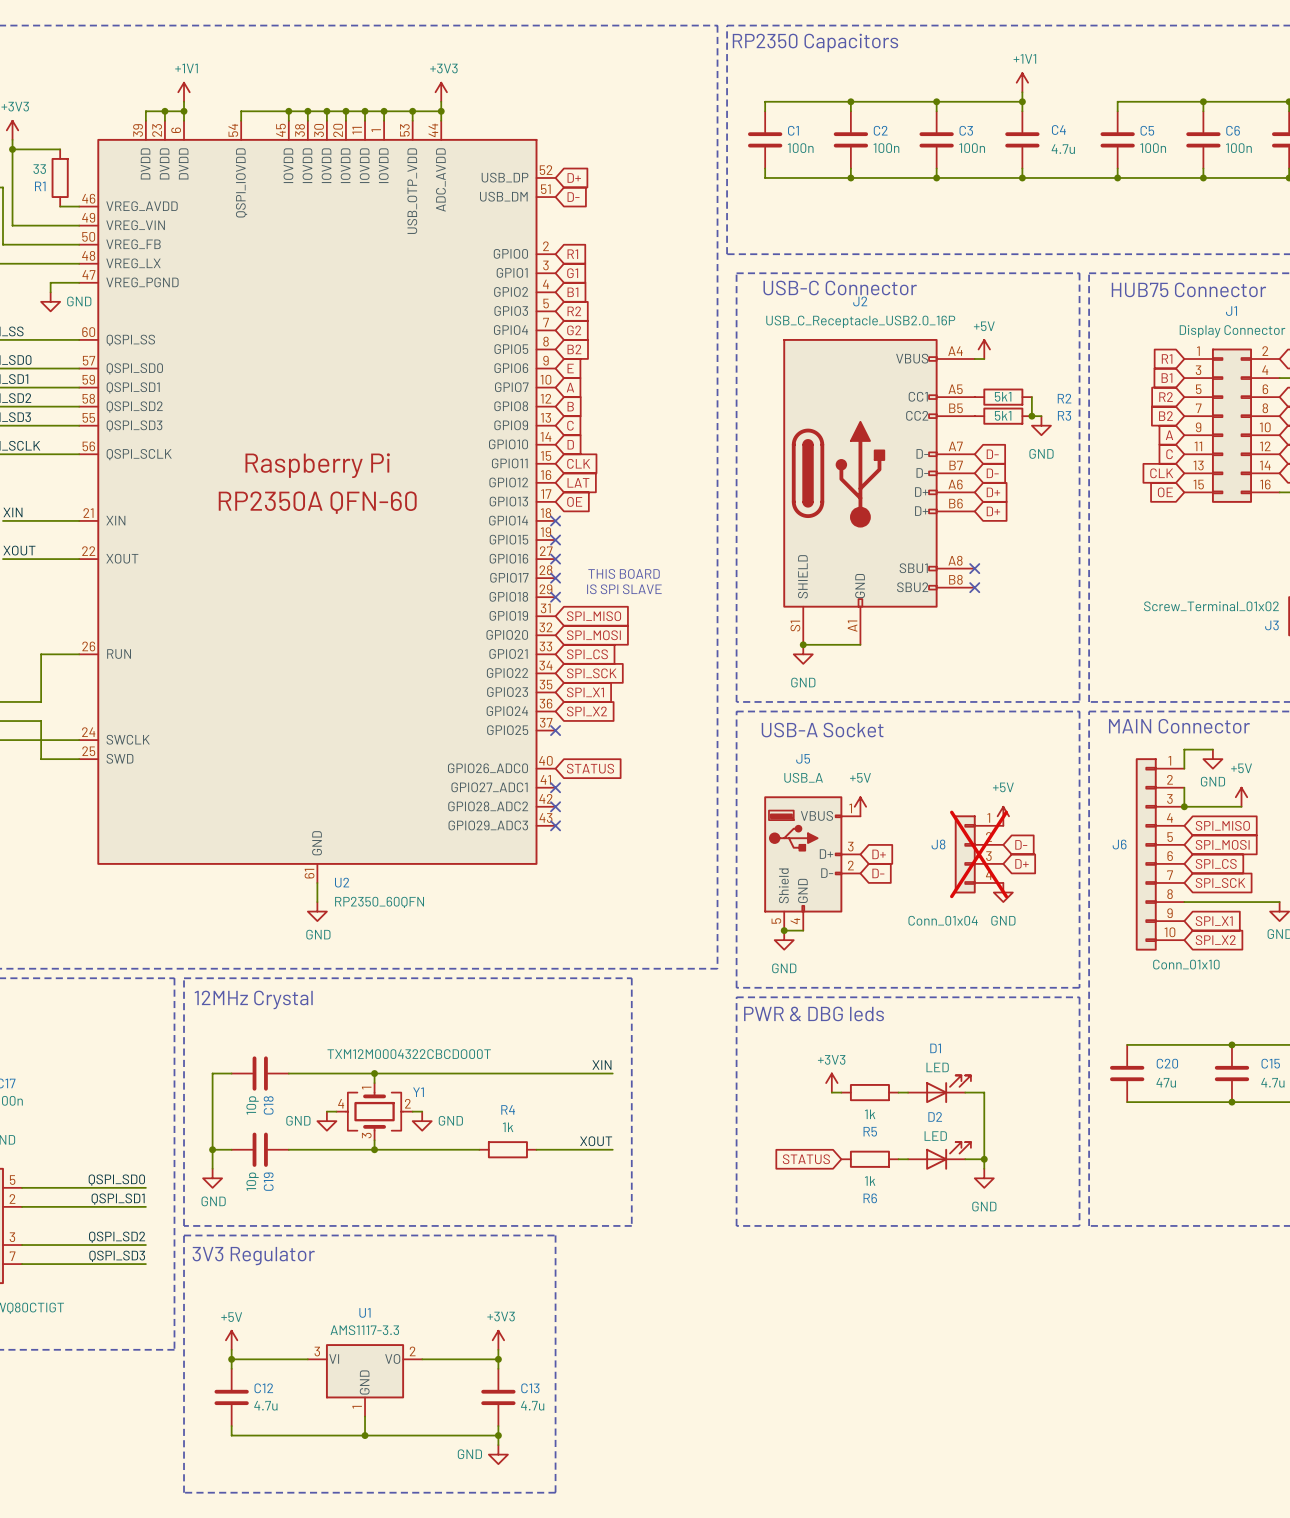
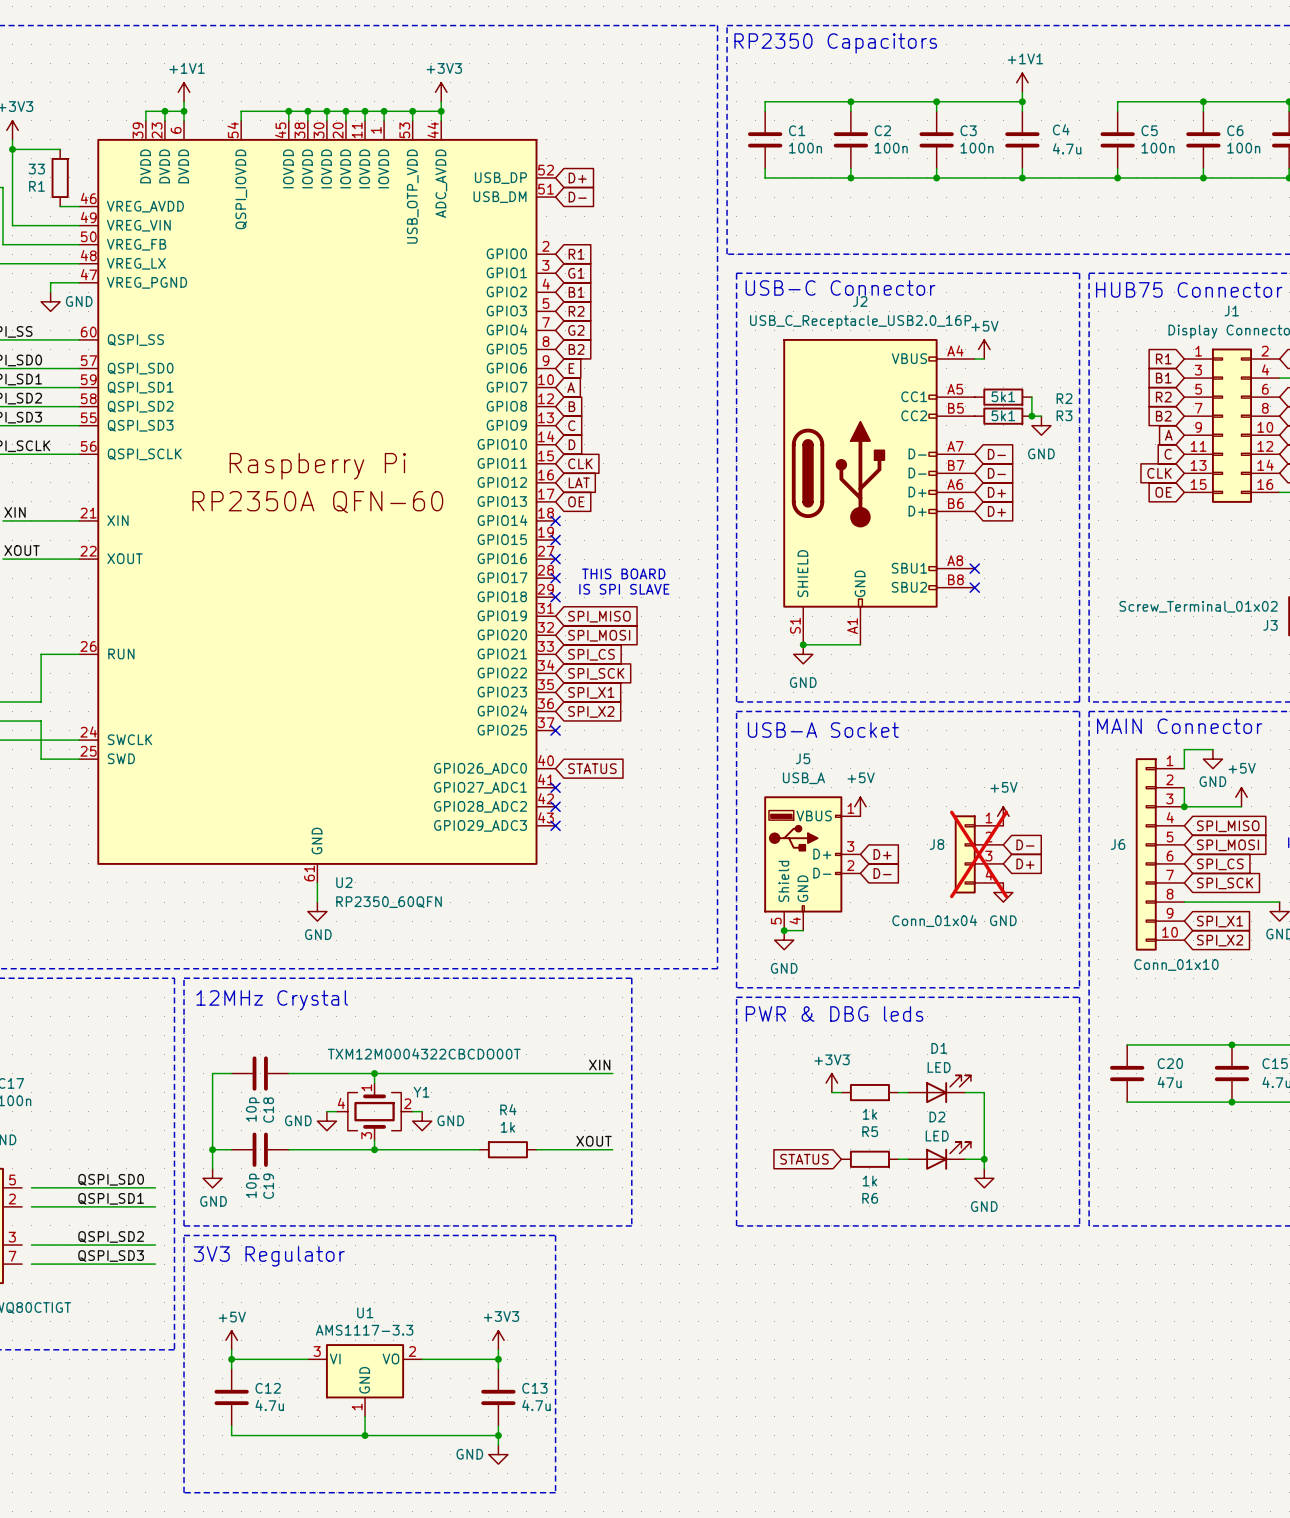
wire: (22, 1187) (31, 1187) -> (145, 1187) (155, 1187)
wire: (22, 1206) (31, 1206) -> (145, 1206) (155, 1206)
wire: (22, 1245) (31, 1245) -> (145, 1245) (155, 1245)
wire: (22, 1264) (31, 1264) -> (145, 1264) (155, 1264)

